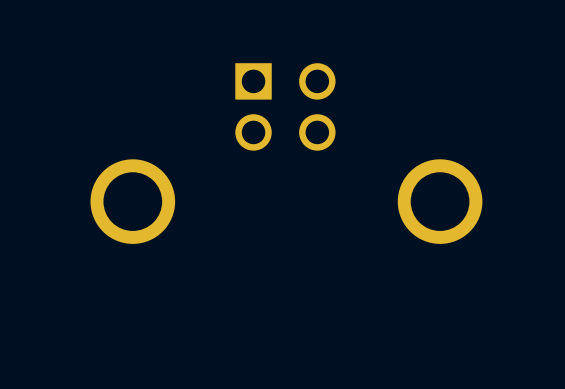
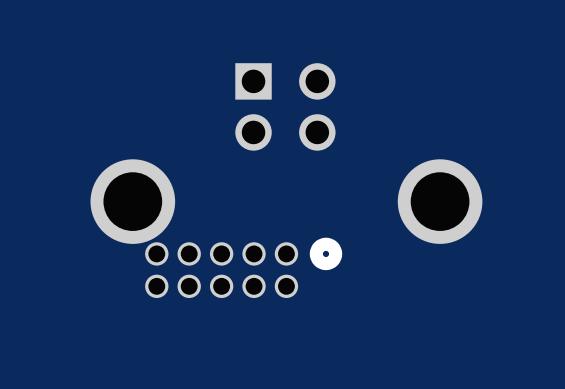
part: none -> (243, 267)

